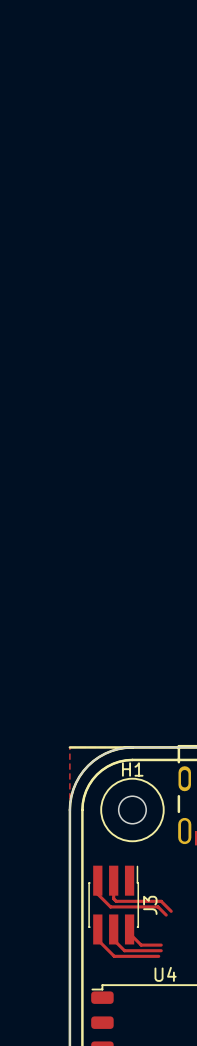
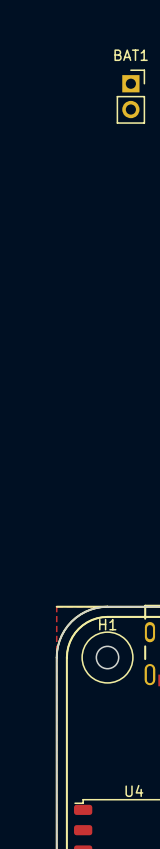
BAT1: none -> (130, 96)
track: (97, 880) (97, 894) (110, 906) (158, 906) (166, 915) -> none
track: (113, 880) (113, 898) (116, 901) (161, 901) (171, 911) -> none
J3: (113, 905) -> none
track: (97, 929) (97, 939) (114, 956) (158, 956) -> none
track: (113, 929) (113, 939) (124, 950) (161, 950) -> none
track: (129, 929) (129, 933) (141, 945) (161, 945) -> none

